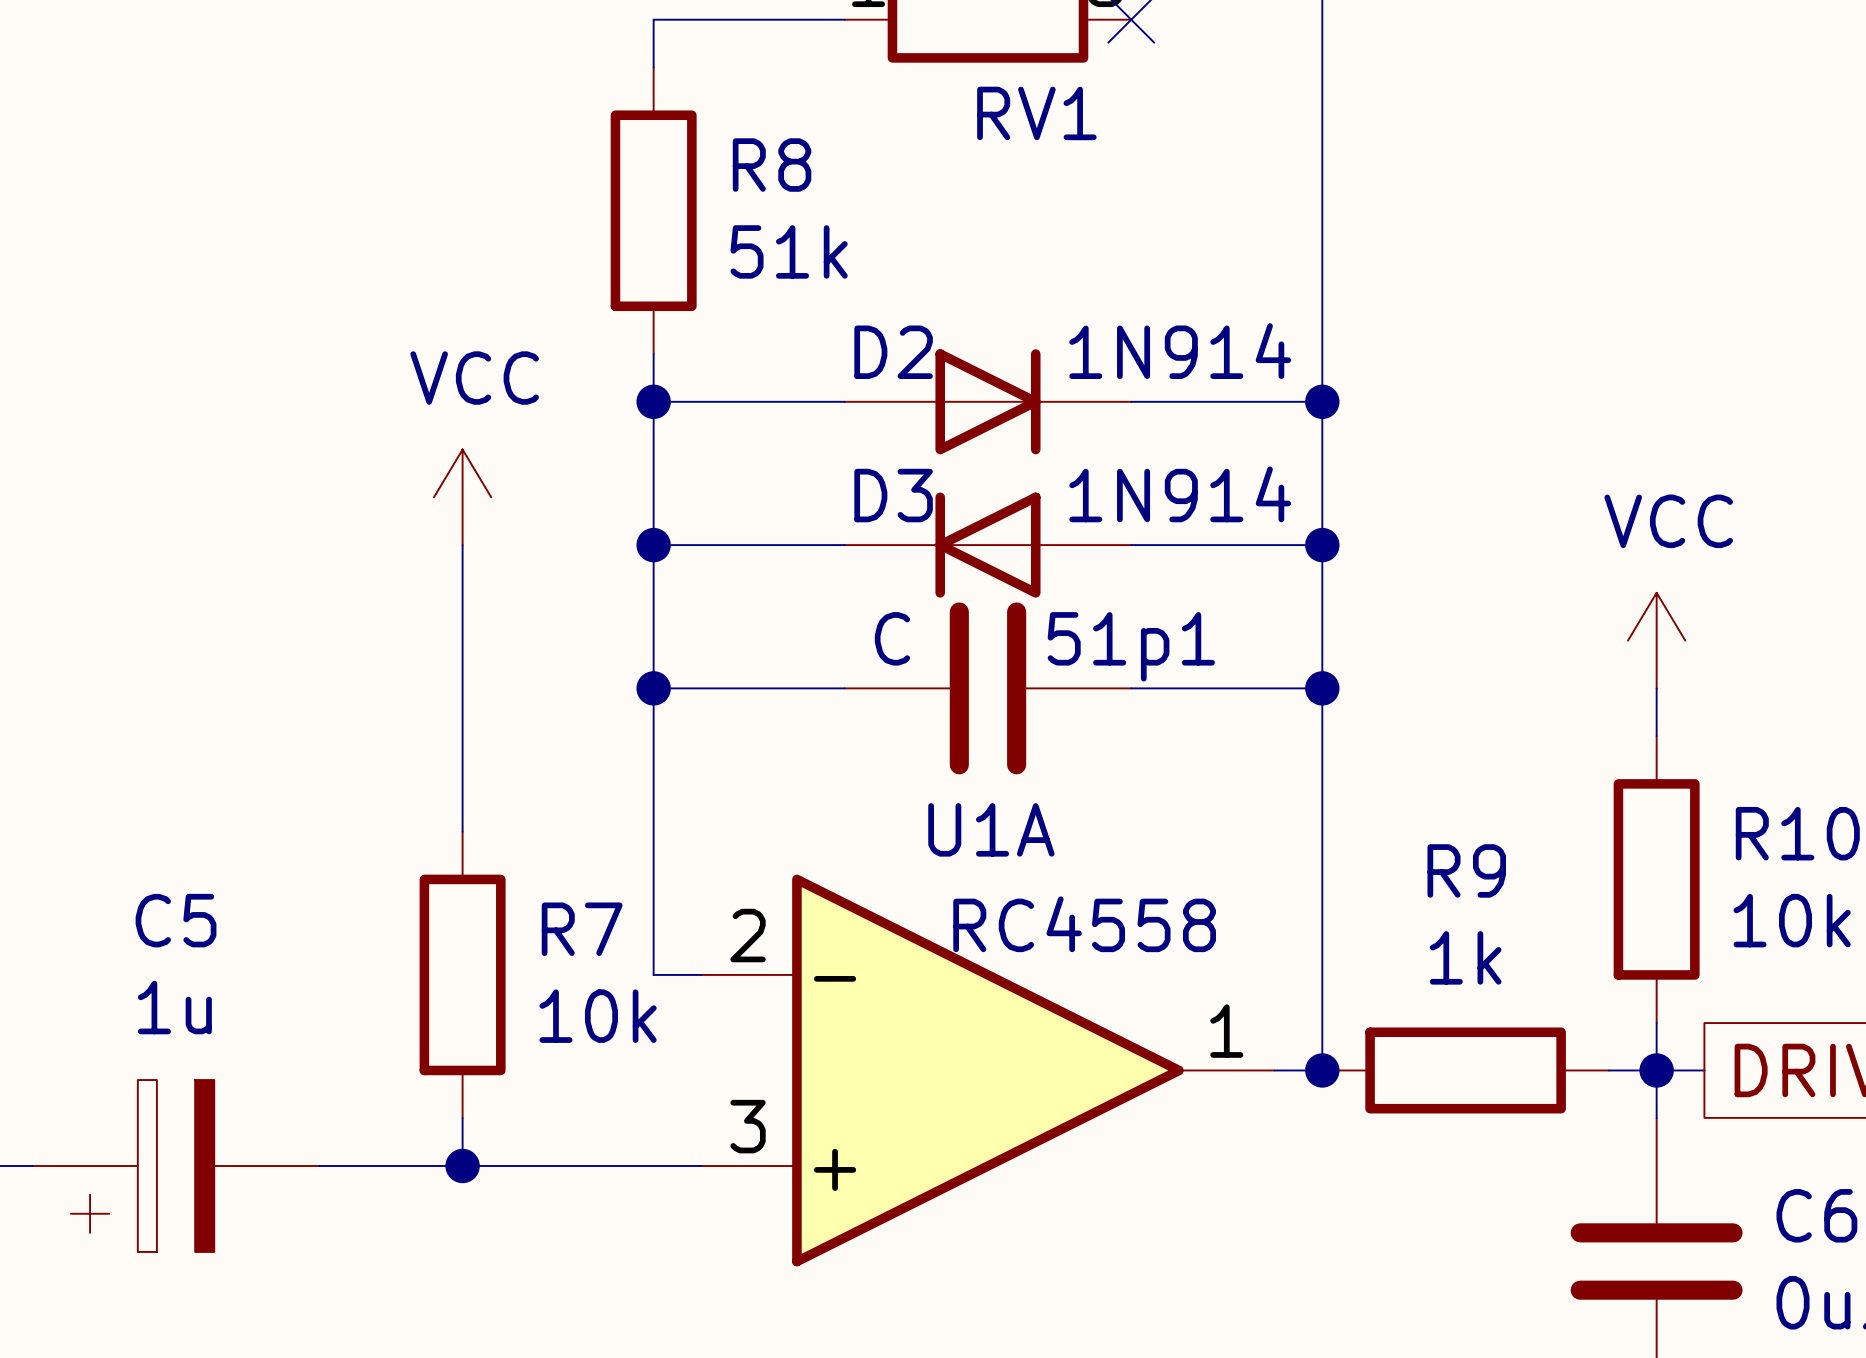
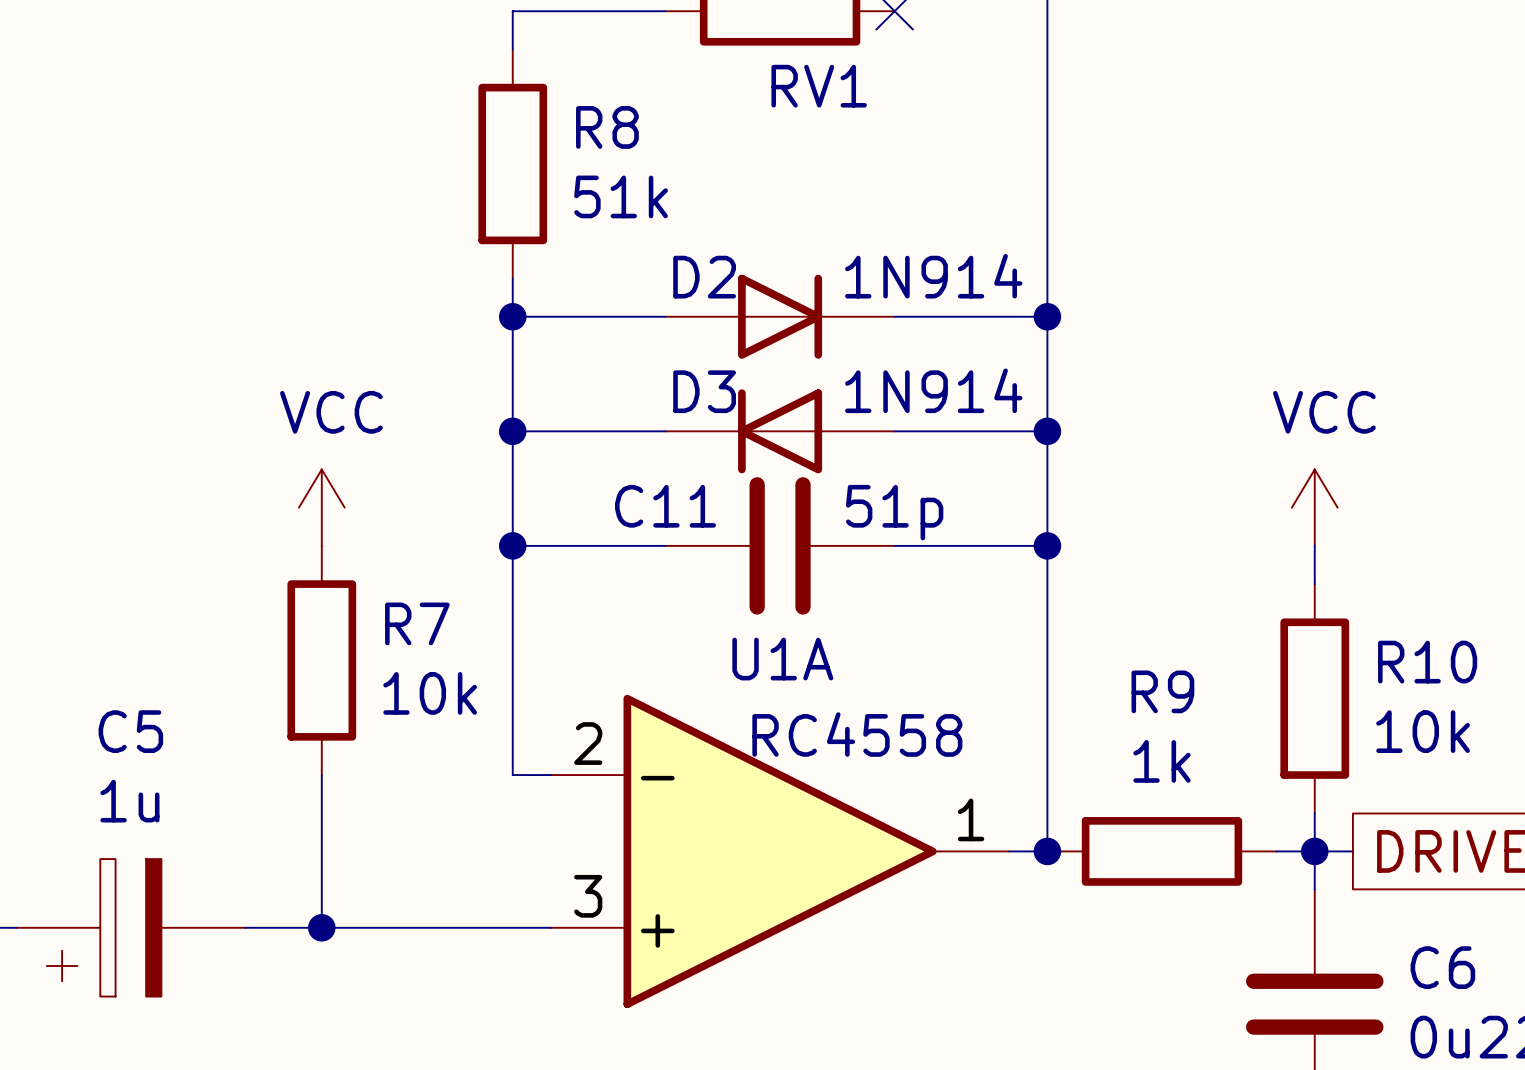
power symbol position: VCC (462, 497) -> VCC (321, 507)
wire: (462, 545) (462, 831) -> none
51p1 value: C (892, 638) -> 51p (894, 512)
51p1 name: 51p1 (1131, 646) -> C11 (665, 506)
wire: none -> (321, 775) (321, 927)
R7 position: (462, 974) -> (321, 660)
wire: (462, 1118) (462, 1165) -> none
junction position: (462, 1165) -> (321, 927)

